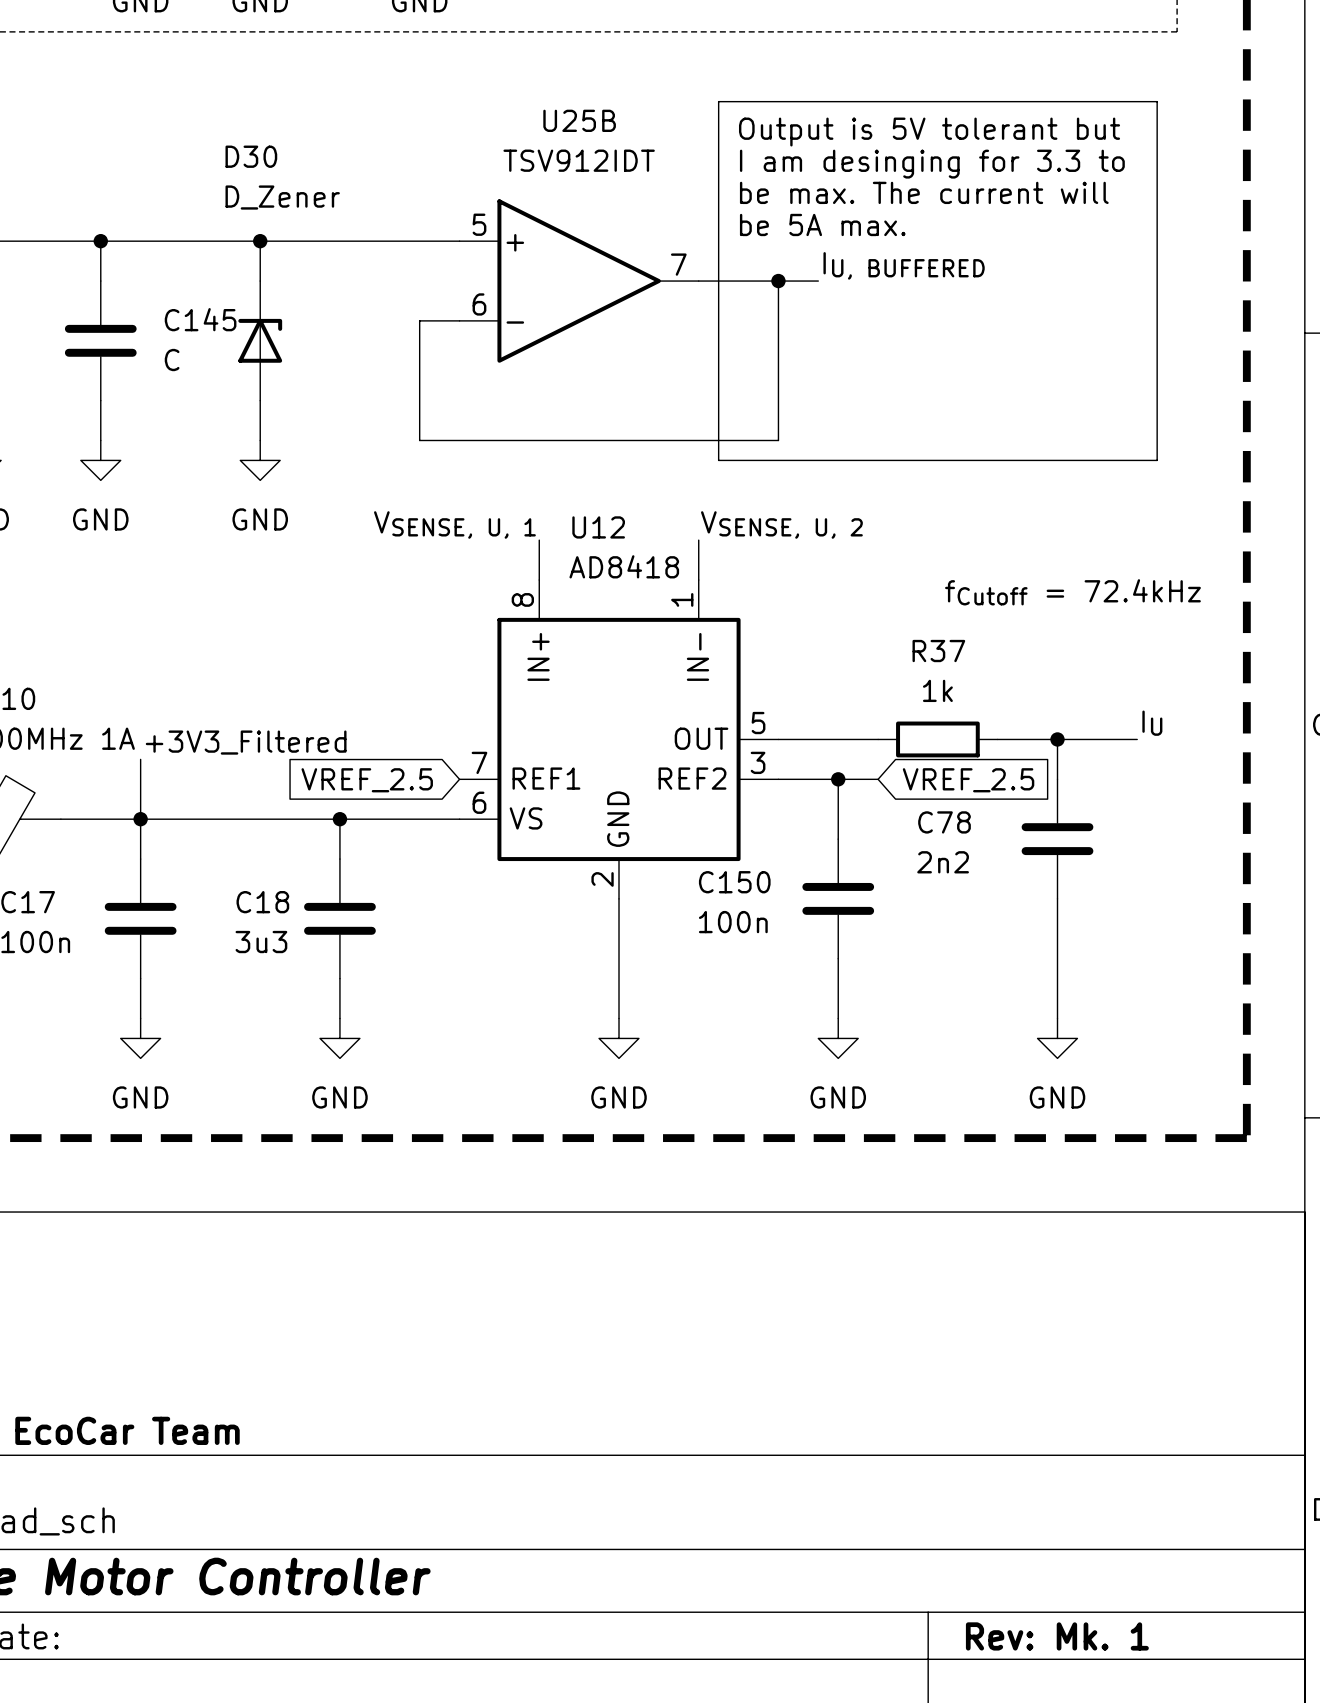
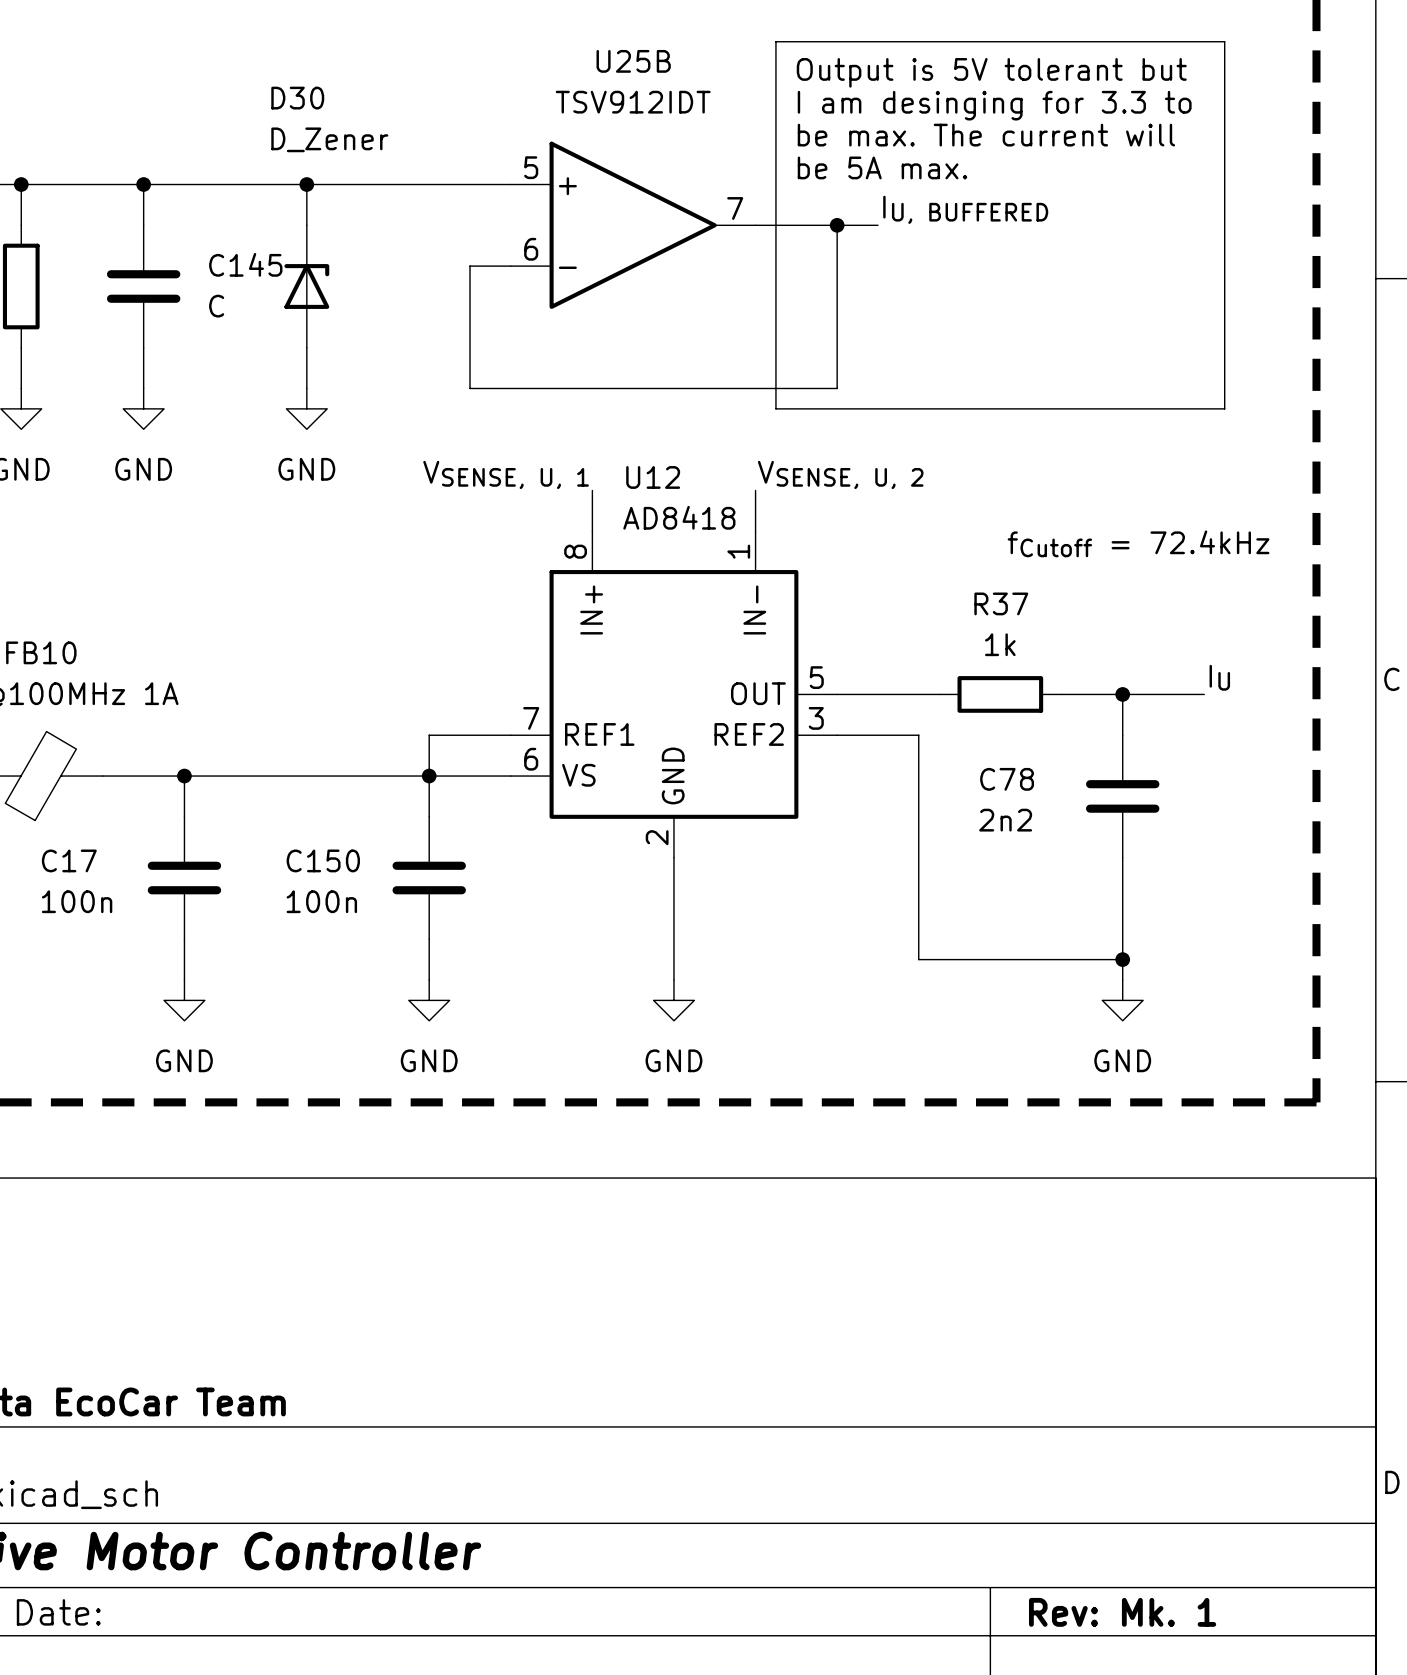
label: +3V3_Filtered (246, 742) -> none
wire: (140, 759) (140, 819) -> none
wire: none -> (510, 735) (429, 735) (429, 816)
wire: (838, 779) (838, 839) -> none
junction: (838, 779) -> none
wire: (858, 779) (878, 779) -> (918, 735) (918, 959) (1122, 959)
global label: VREF_2.5 (367, 780) -> none
global label: VREF_2.5 (968, 780) -> none
wire: (339, 819) (339, 859) -> none
junction position: (339, 819) -> (429, 776)
C150 position: (838, 898) -> (429, 878)
C18: 3u3 (339, 918) -> none
wire: (838, 958) (838, 1018) -> none
wire: (339, 978) (339, 1018) -> (429, 939) (429, 980)
junction: none -> (1122, 959)
power symbol position: GND (339, 1038) -> GND (429, 1000)
power symbol: GND (838, 1038) -> none

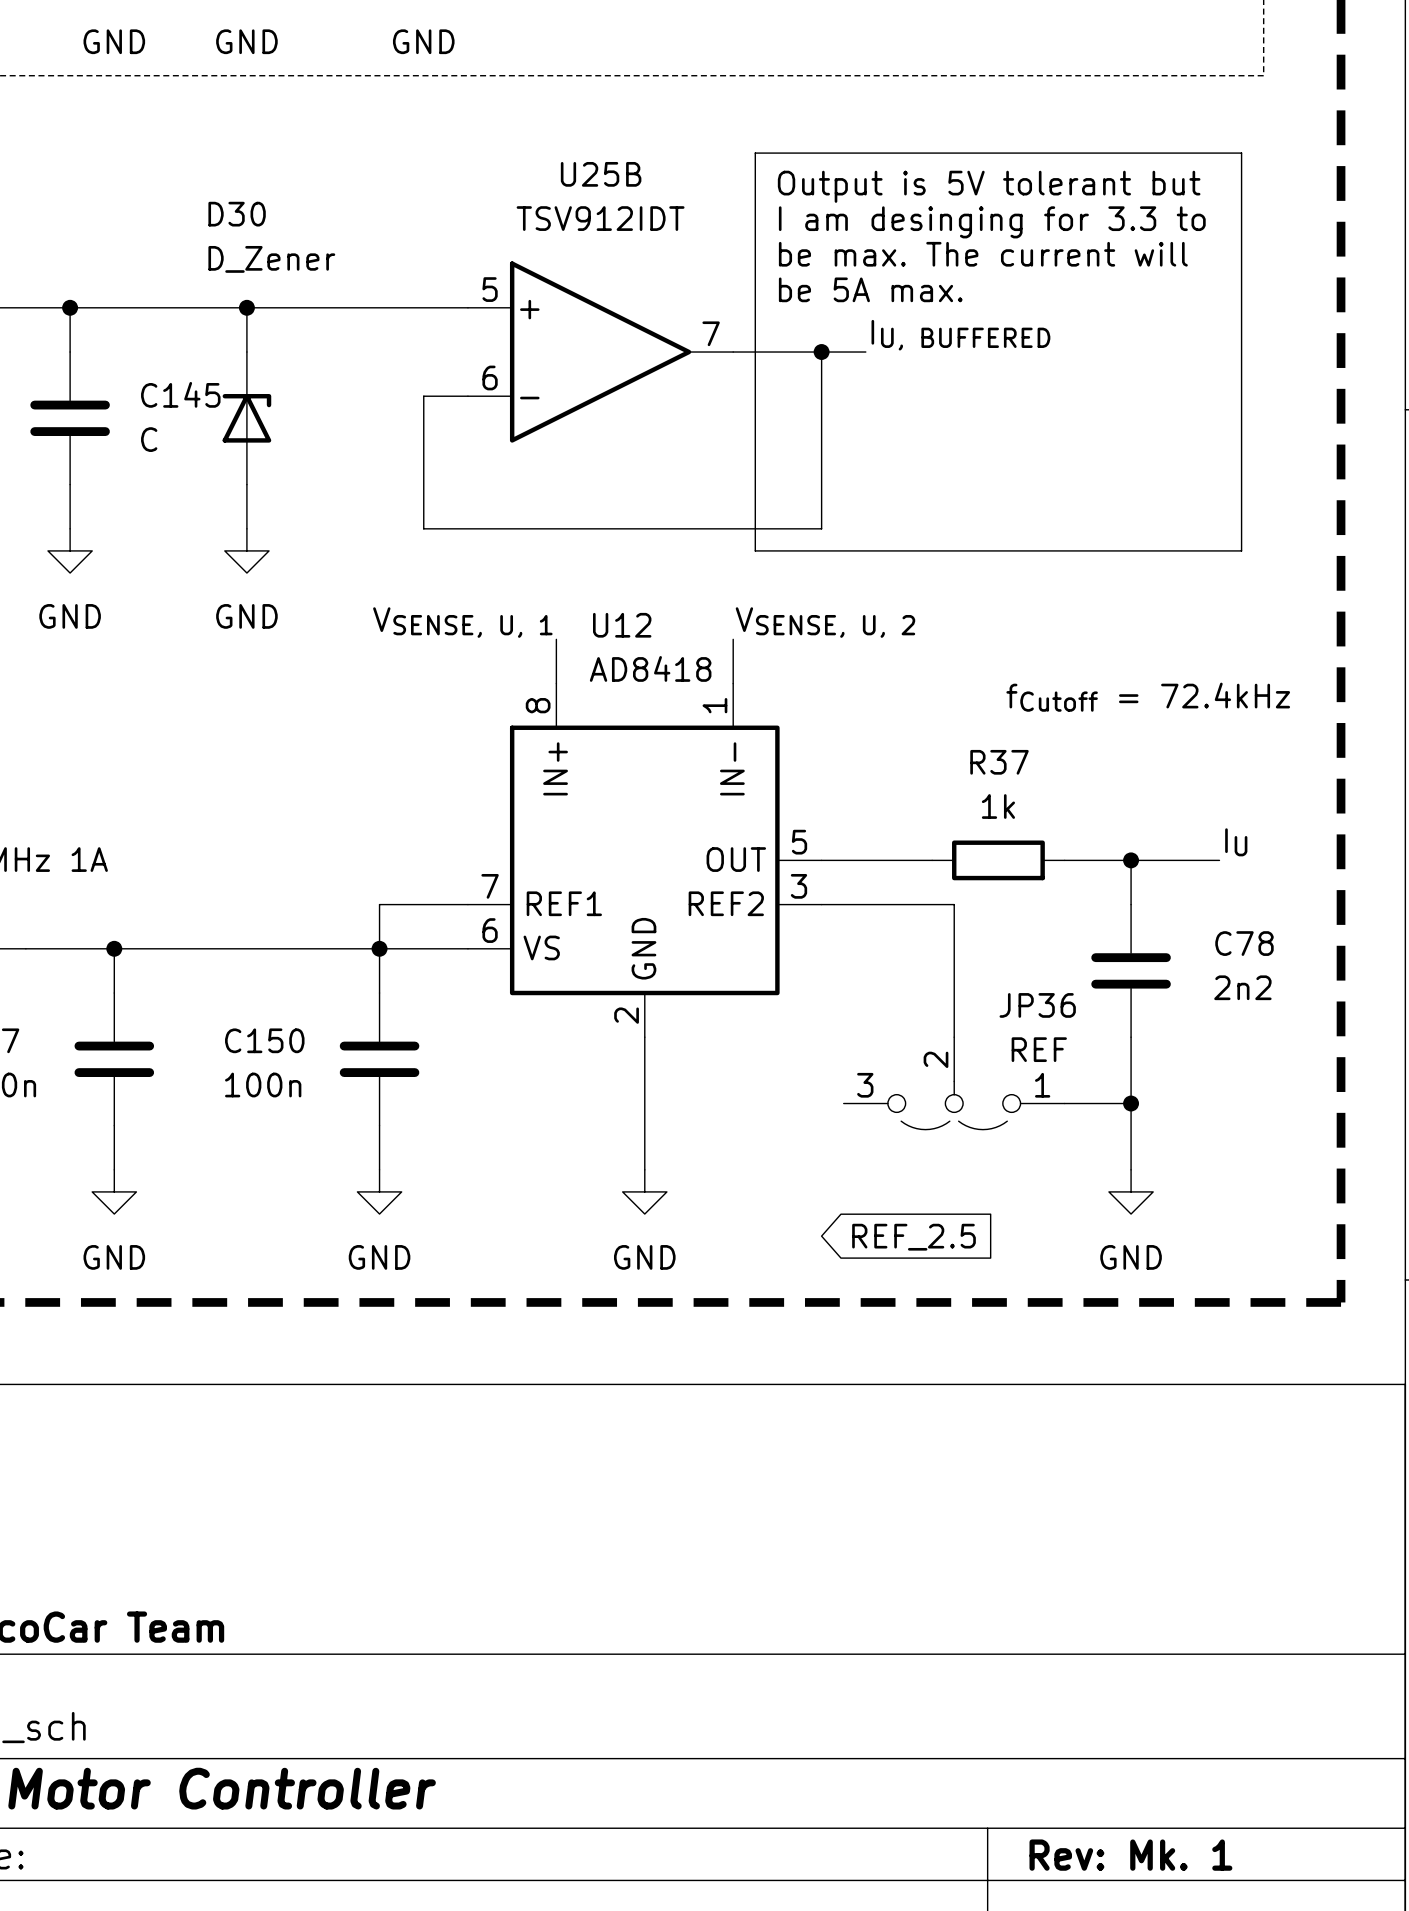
wire: (918, 735) (918, 959) (1122, 959) -> (910, 904) (954, 904) (954, 1037)
C78 name position: C78 (1007, 779) -> C78 (1244, 943)
C78 value position: 2n2 (1005, 820) -> 2n2 (1242, 987)
JP36: none -> REF (954, 1083)
wire: none -> (1064, 1103) (1131, 1103)
junction position: (1122, 959) -> (1131, 1103)
global label: none -> REF_2.5 (914, 1237)

